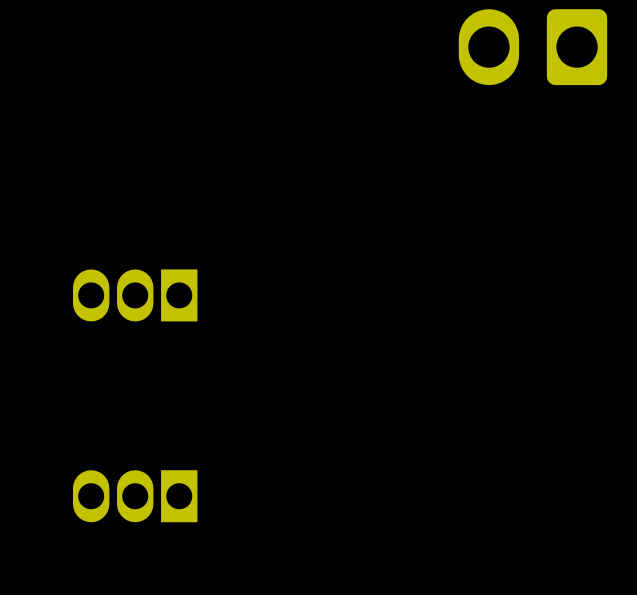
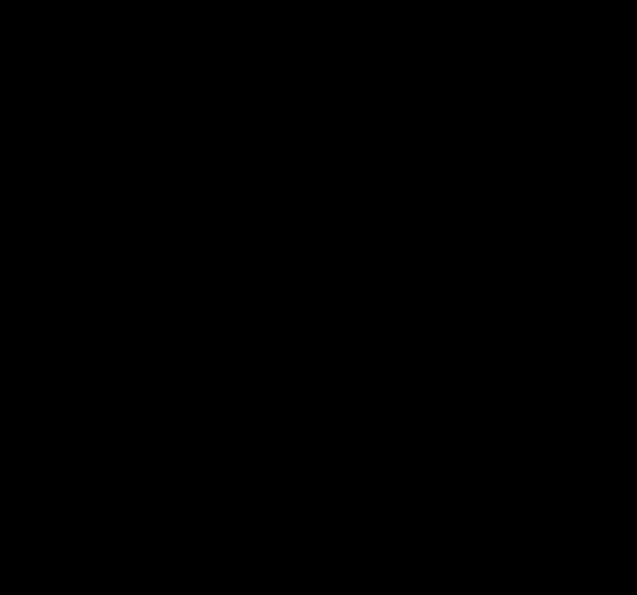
part: (532, 47) -> none
part: (135, 295) -> none
part: (135, 496) -> none

